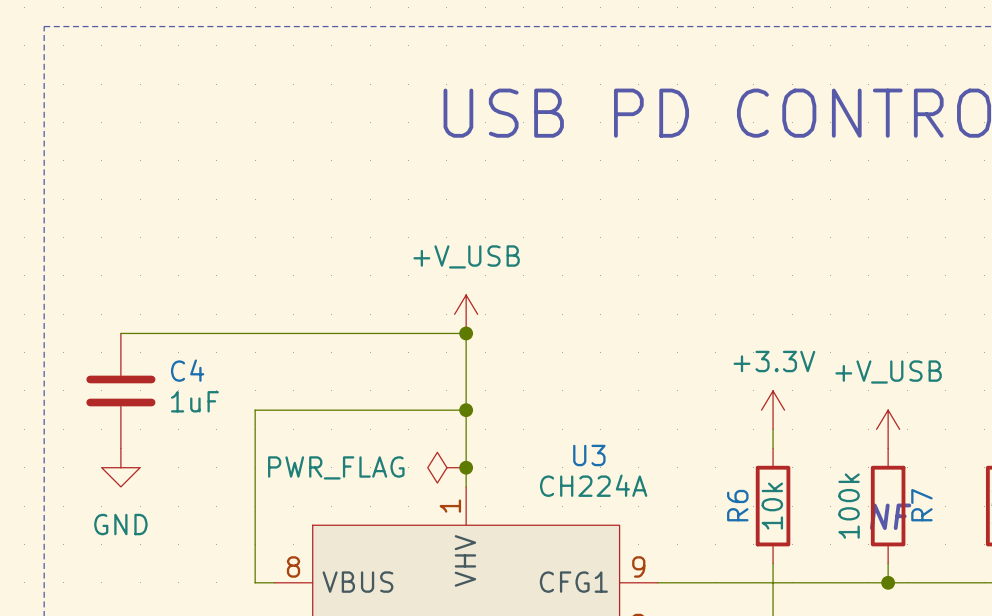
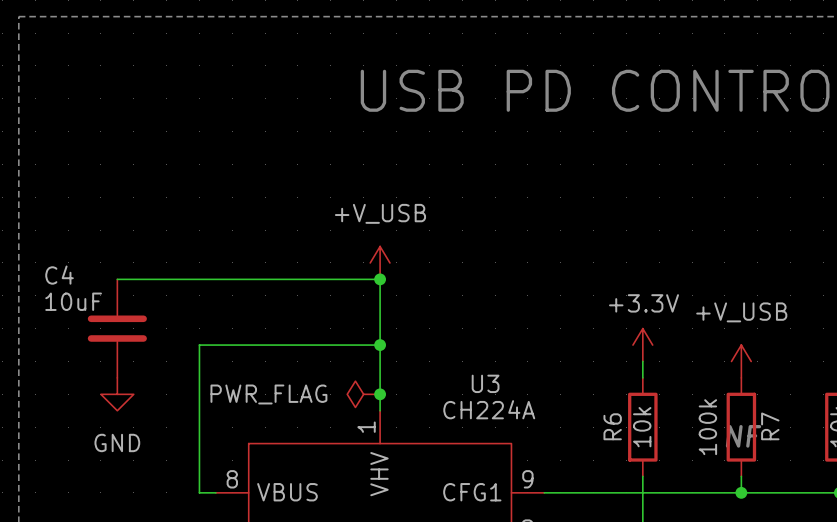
wire: (120, 333) (159, 333) -> none
C4 name position: C4 (187, 370) -> C4 (59, 275)
C4 position: (120, 390) -> (117, 328)
C4 value: 1uF (194, 401) -> 10uF (73, 301)
power symbol position: GND (120, 467) -> GND (117, 394)

